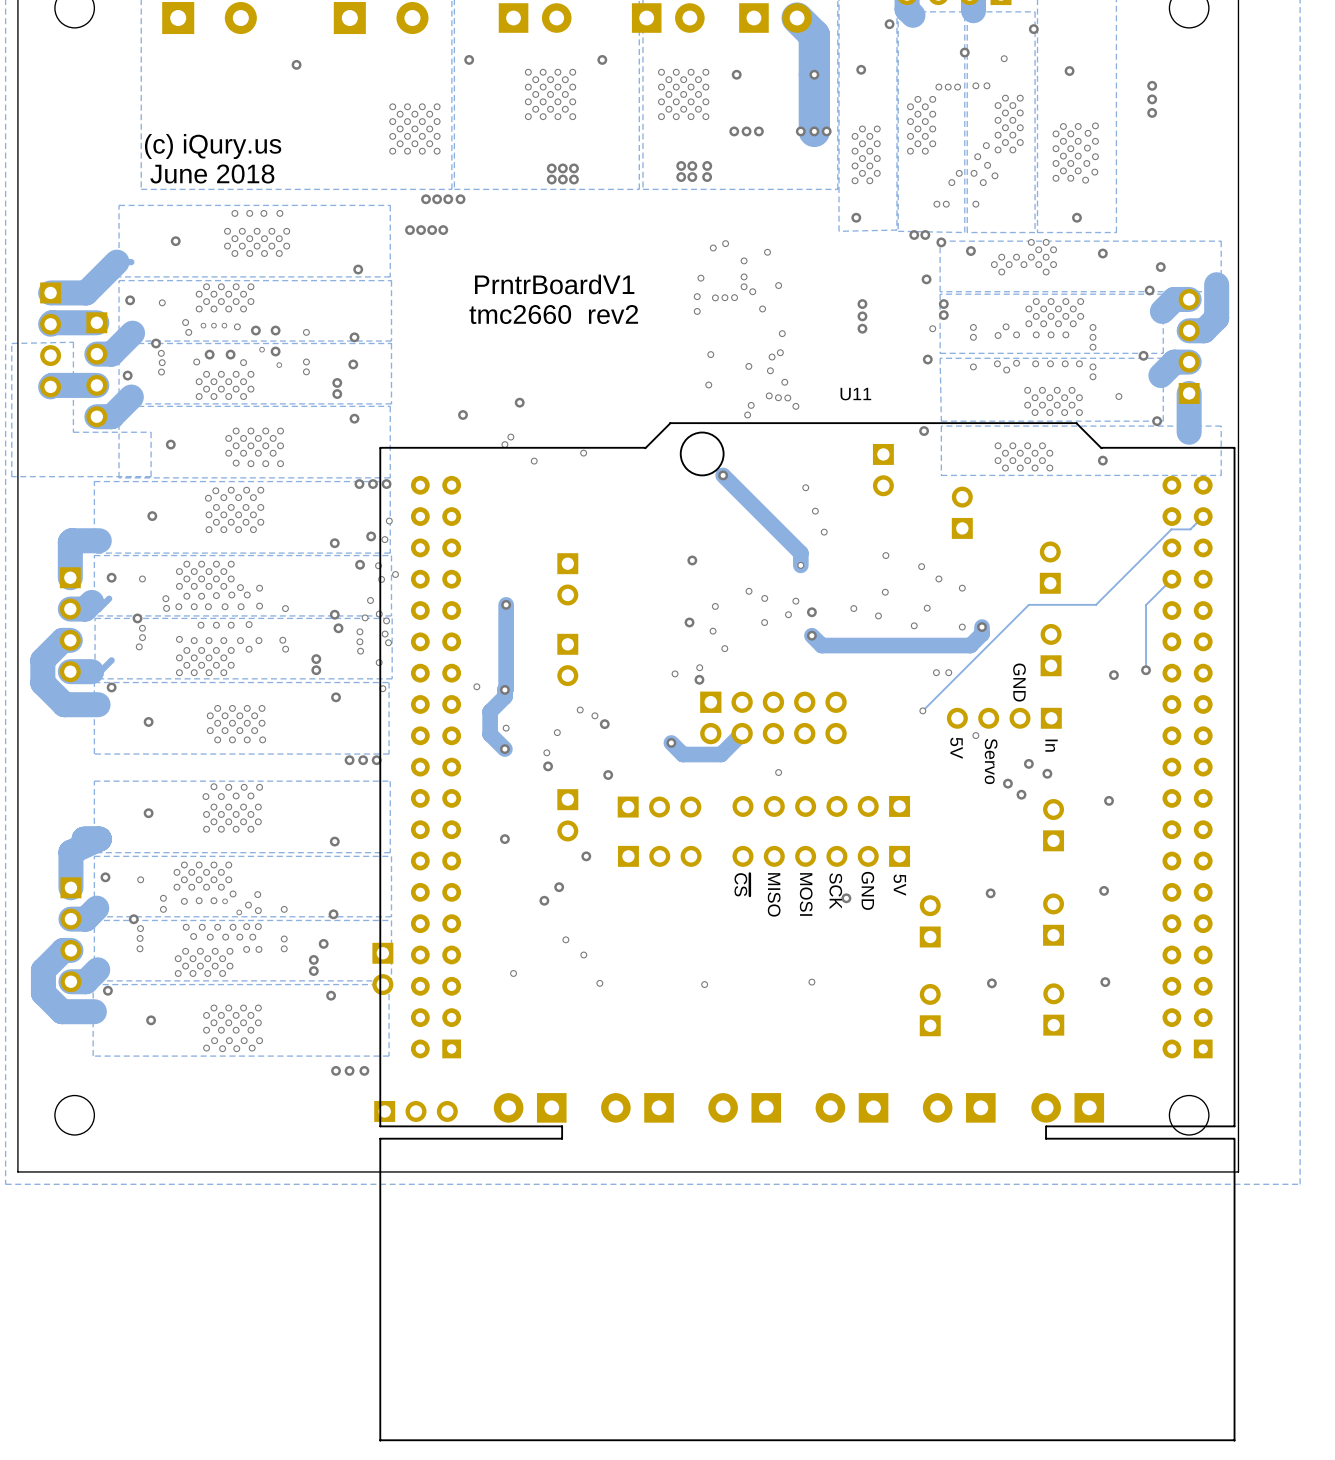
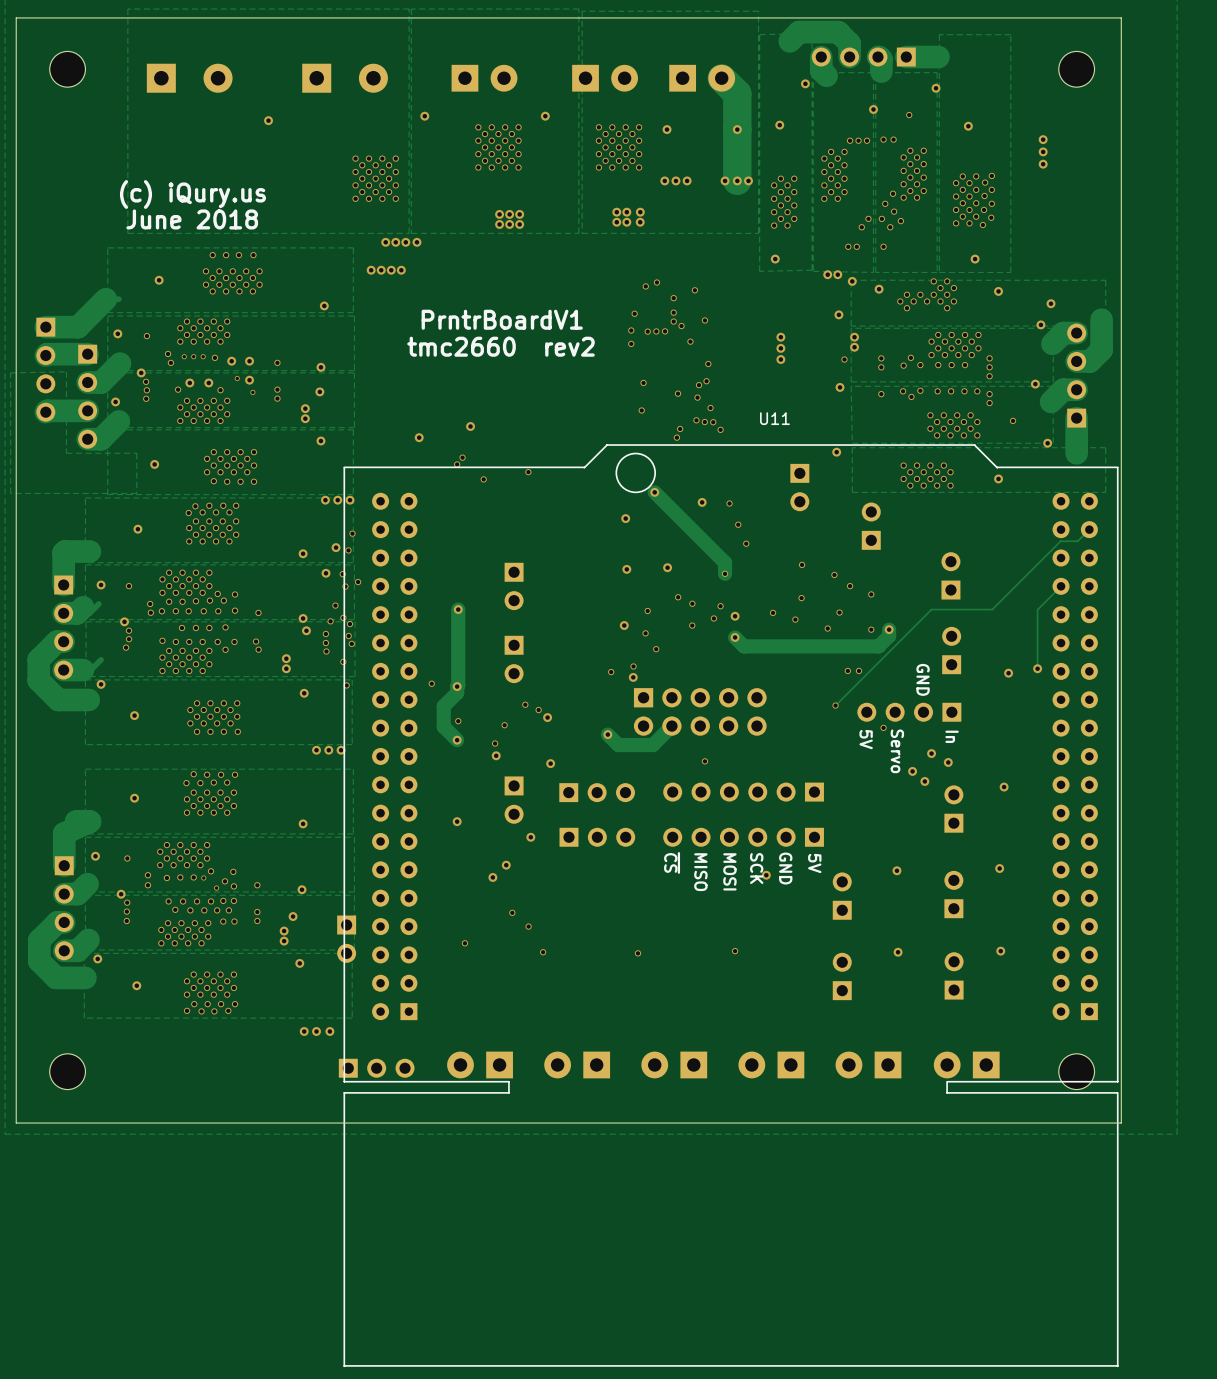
via: none -> (702, 502)
via: none -> (625, 518)
via: none -> (667, 567)

